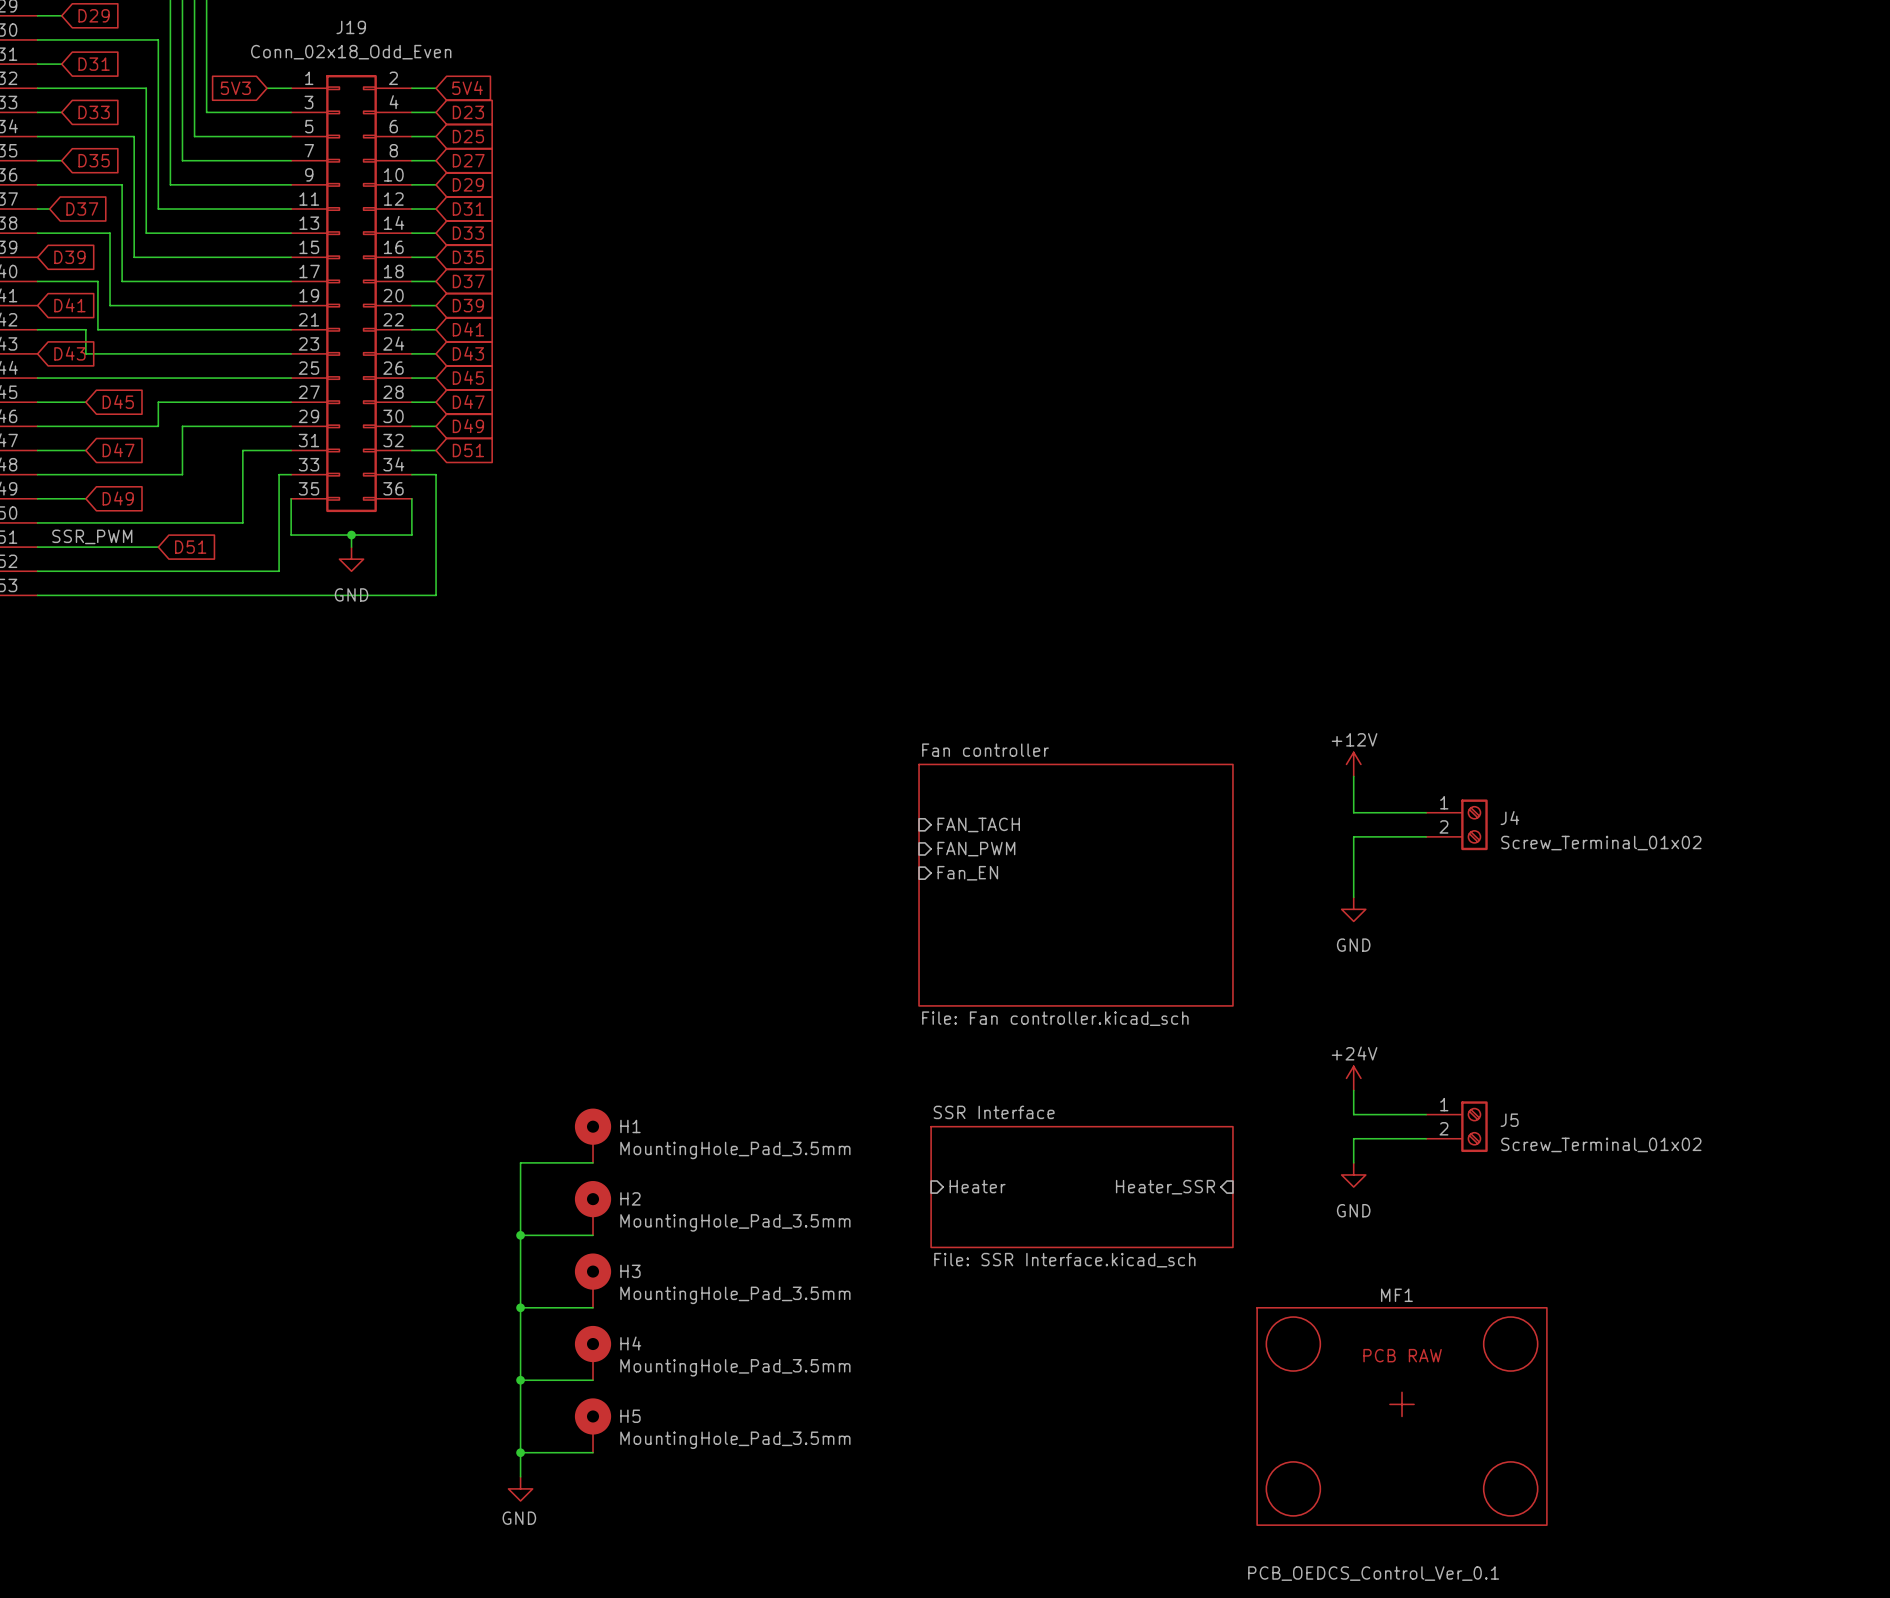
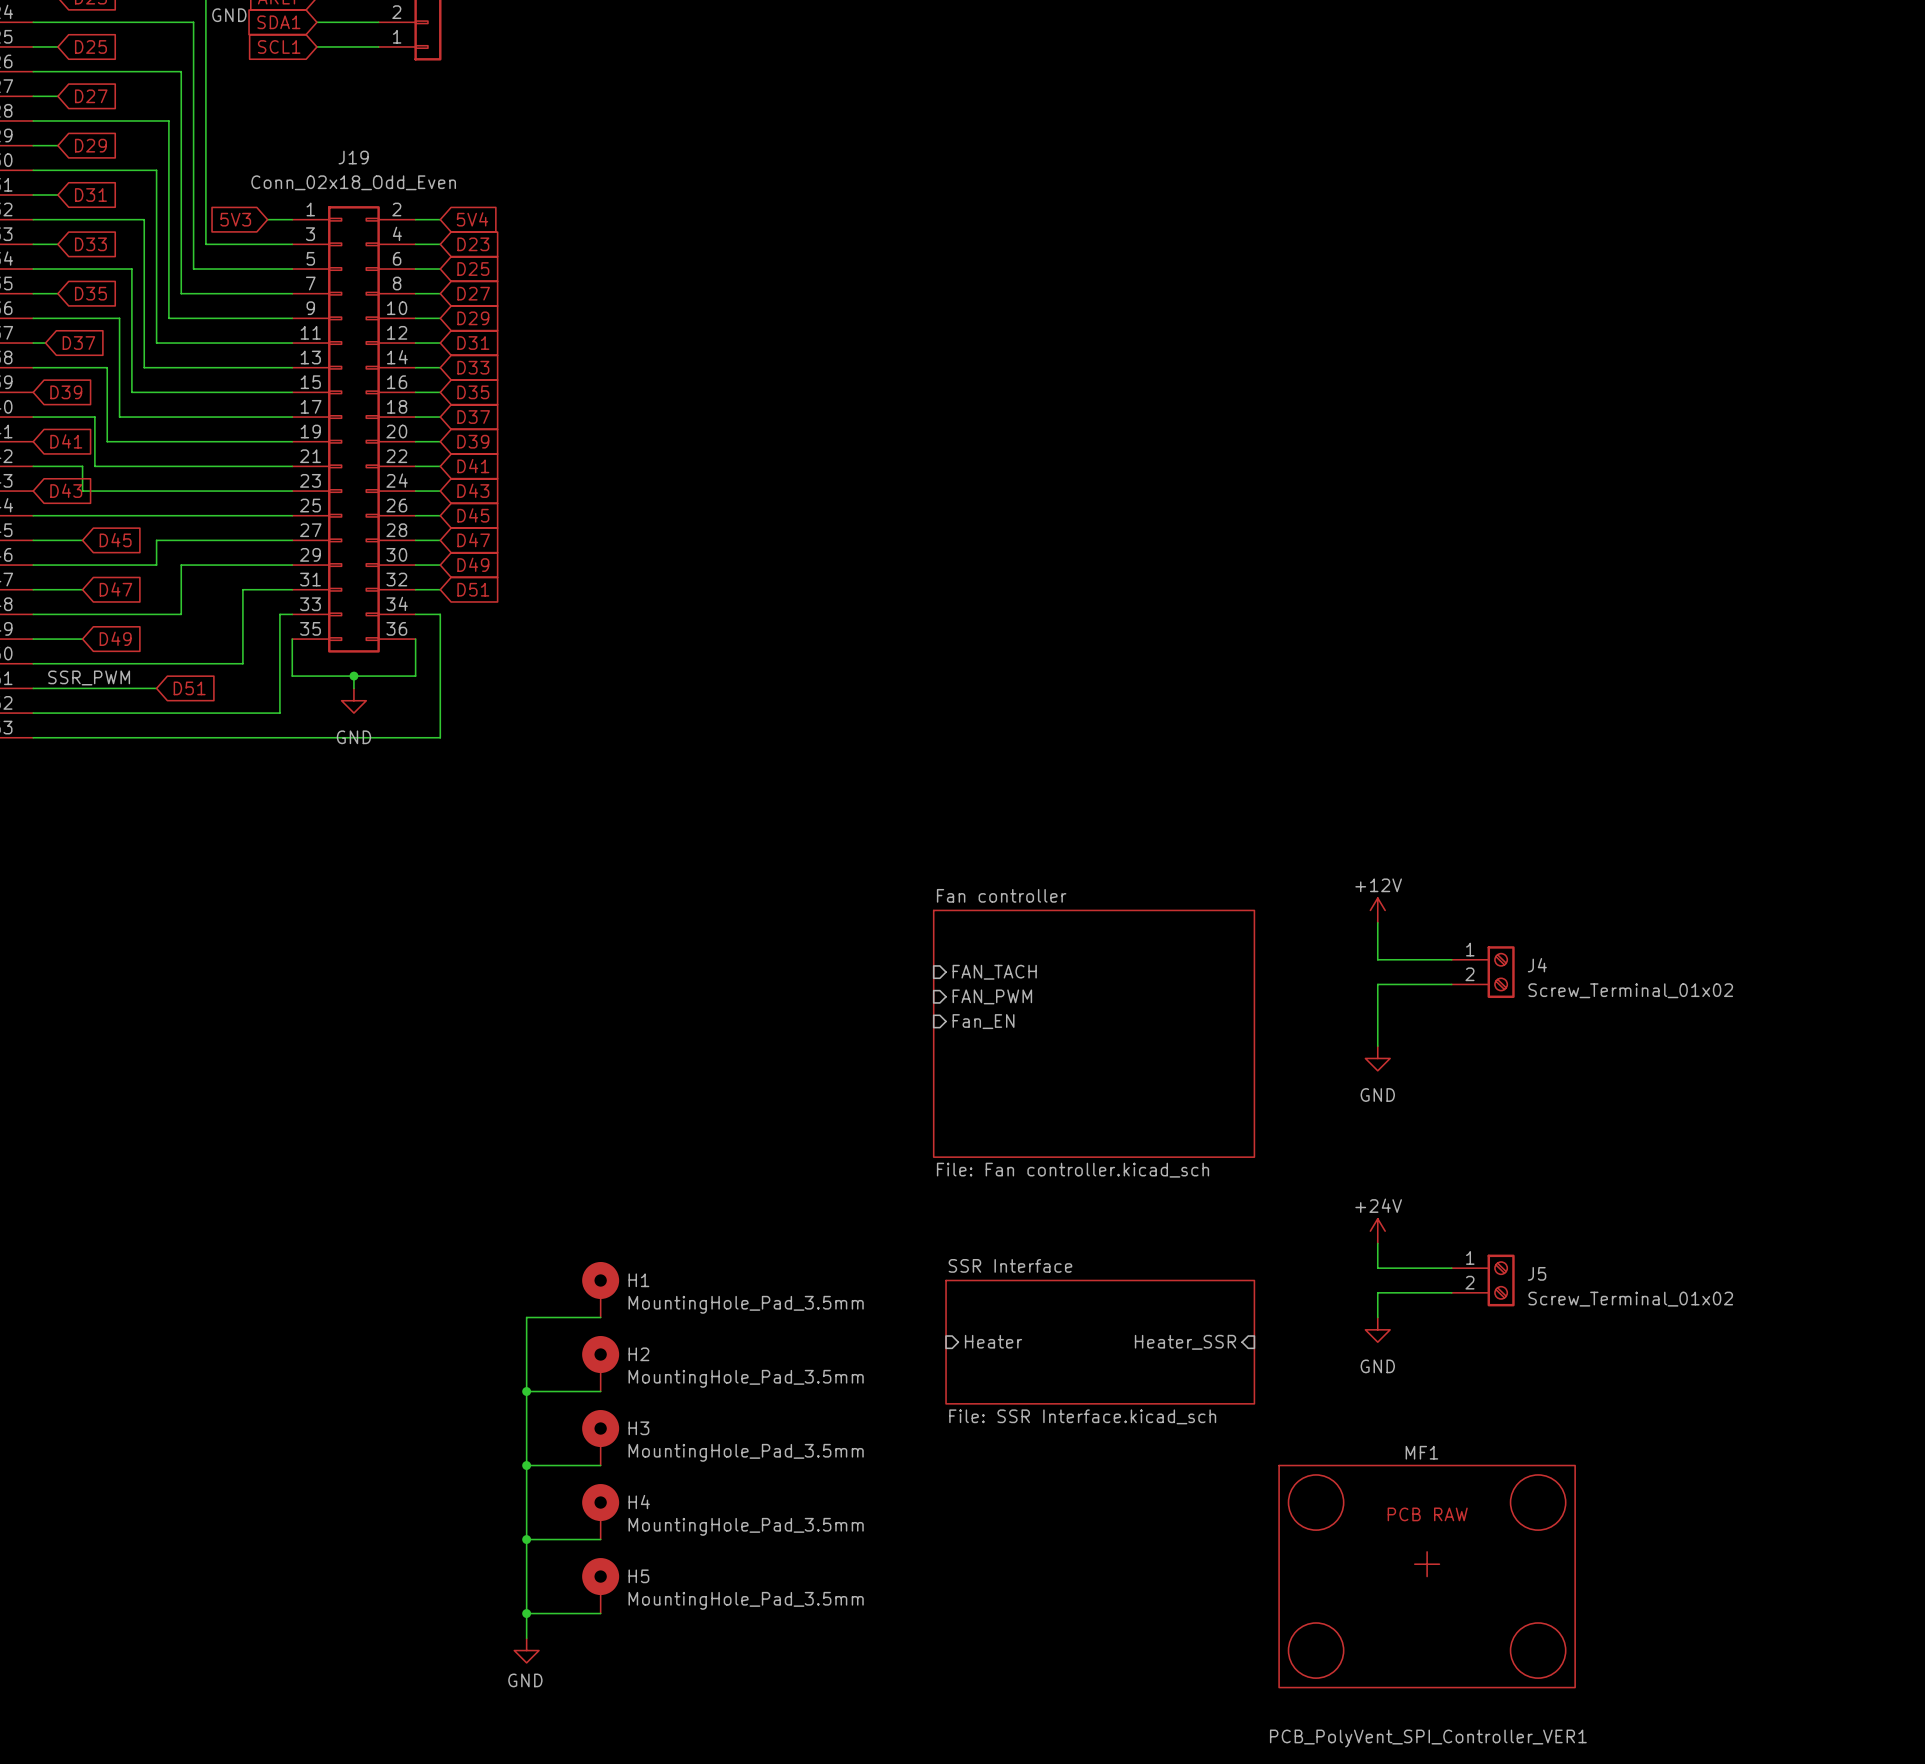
MF1 value: PCB_OEDCS_Control_Ver_0.1 (1373, 1573) -> PCB_PolyVent_SPI_Controller_VER1 (1428, 1738)

